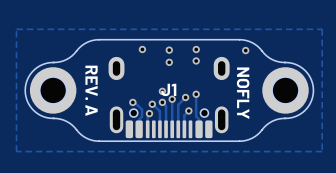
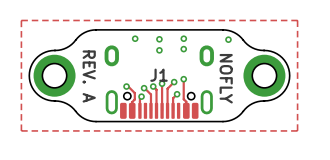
via: (162, 91) -> none

